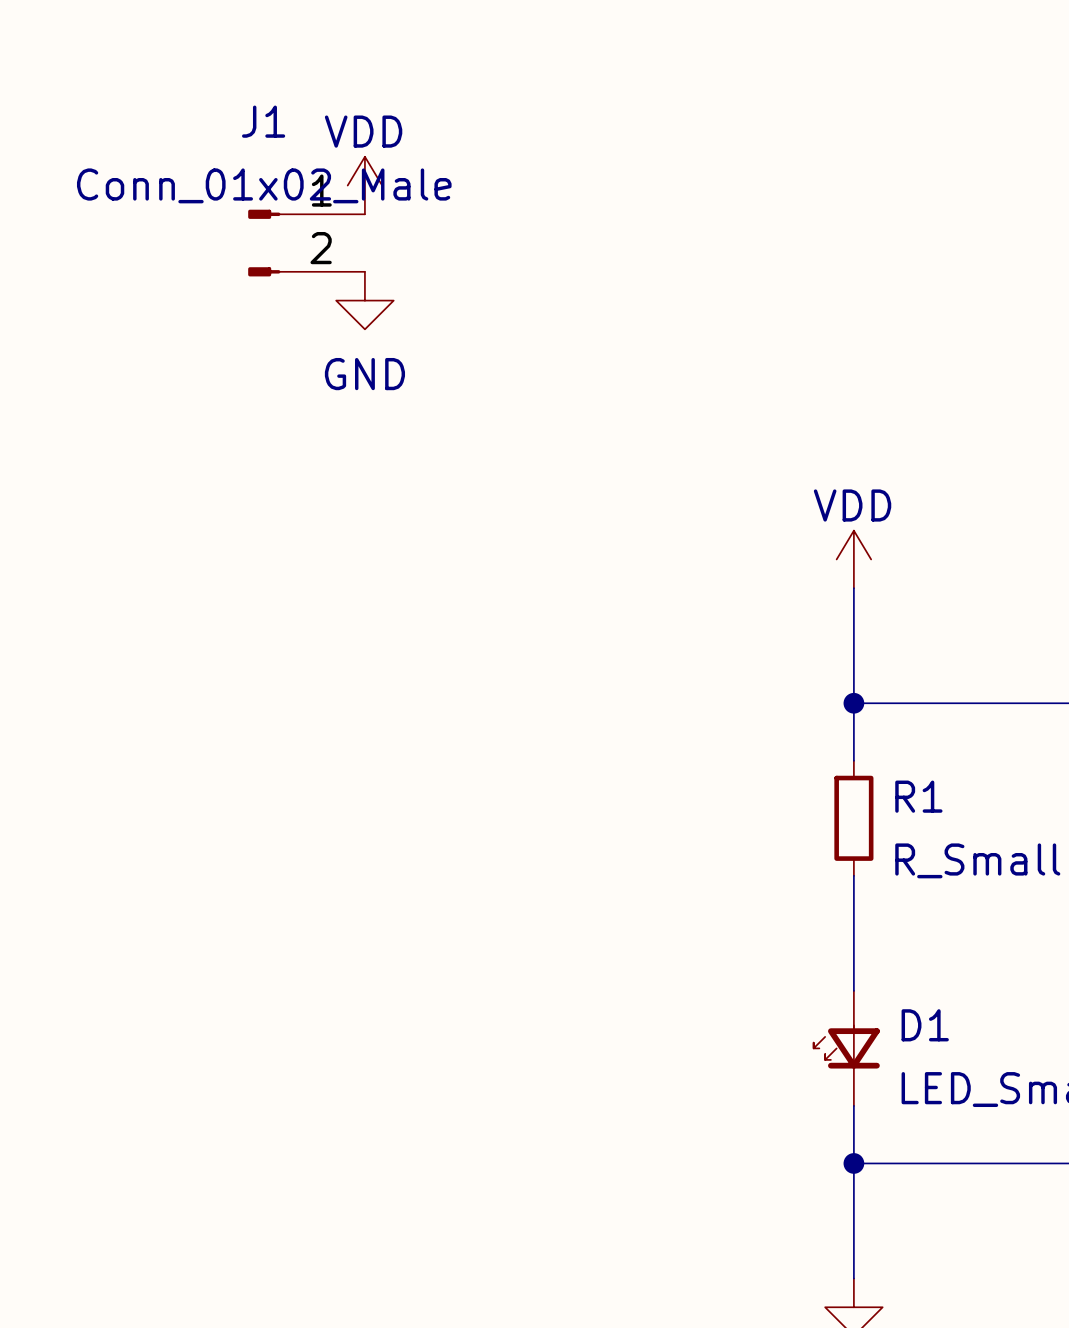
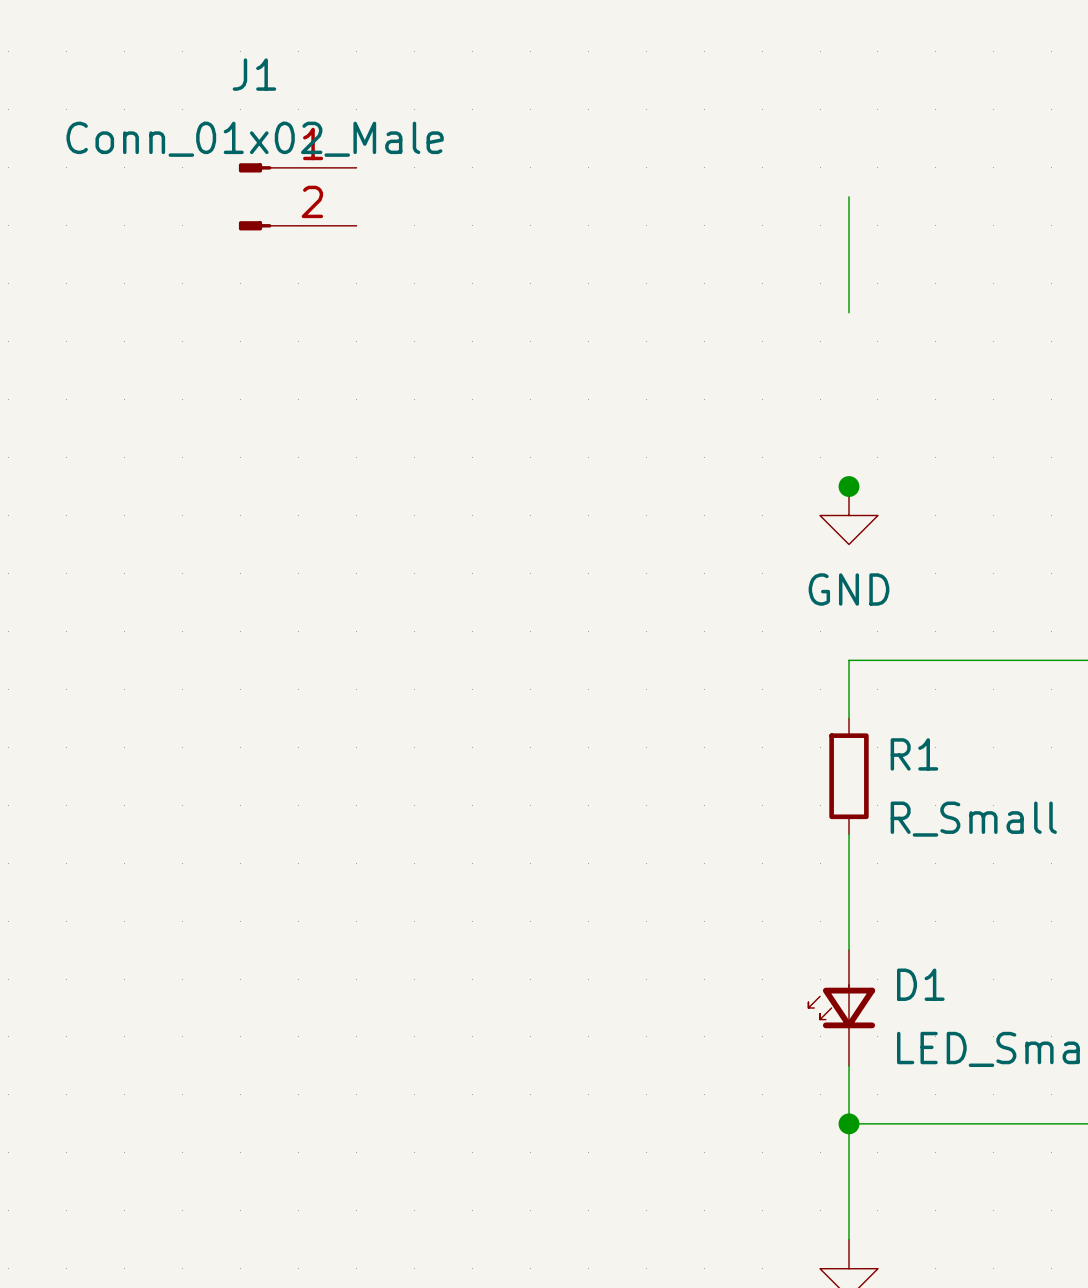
power symbol: VDD (364, 185) -> none
power symbol: GND (364, 300) -> none
junction: none -> (849, 486)
power symbol: VDD (853, 559) -> GND (849, 515)
wire: (853, 588) (853, 703) -> (849, 196) (849, 312)
junction: (853, 703) -> none

